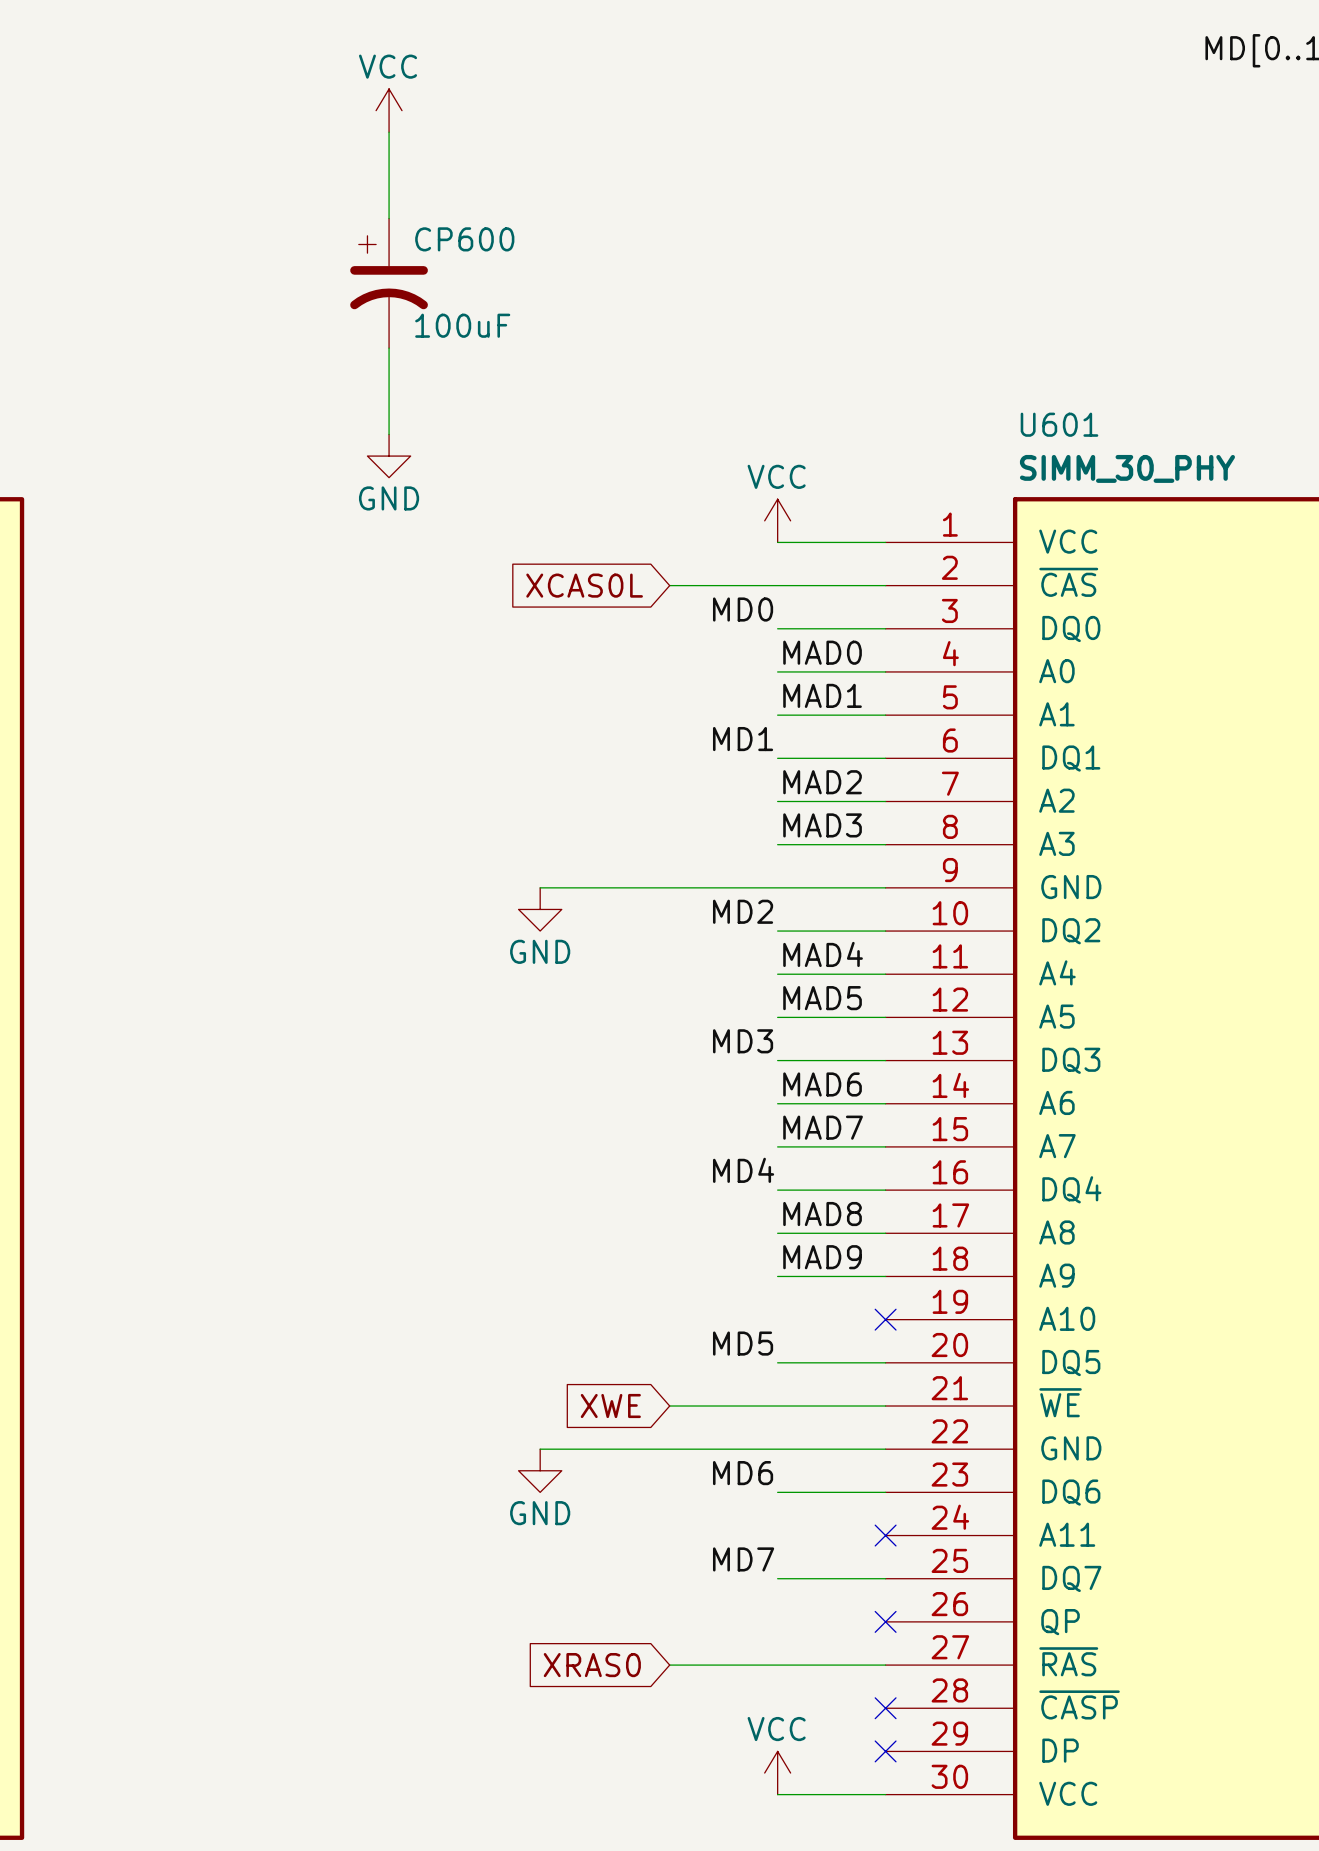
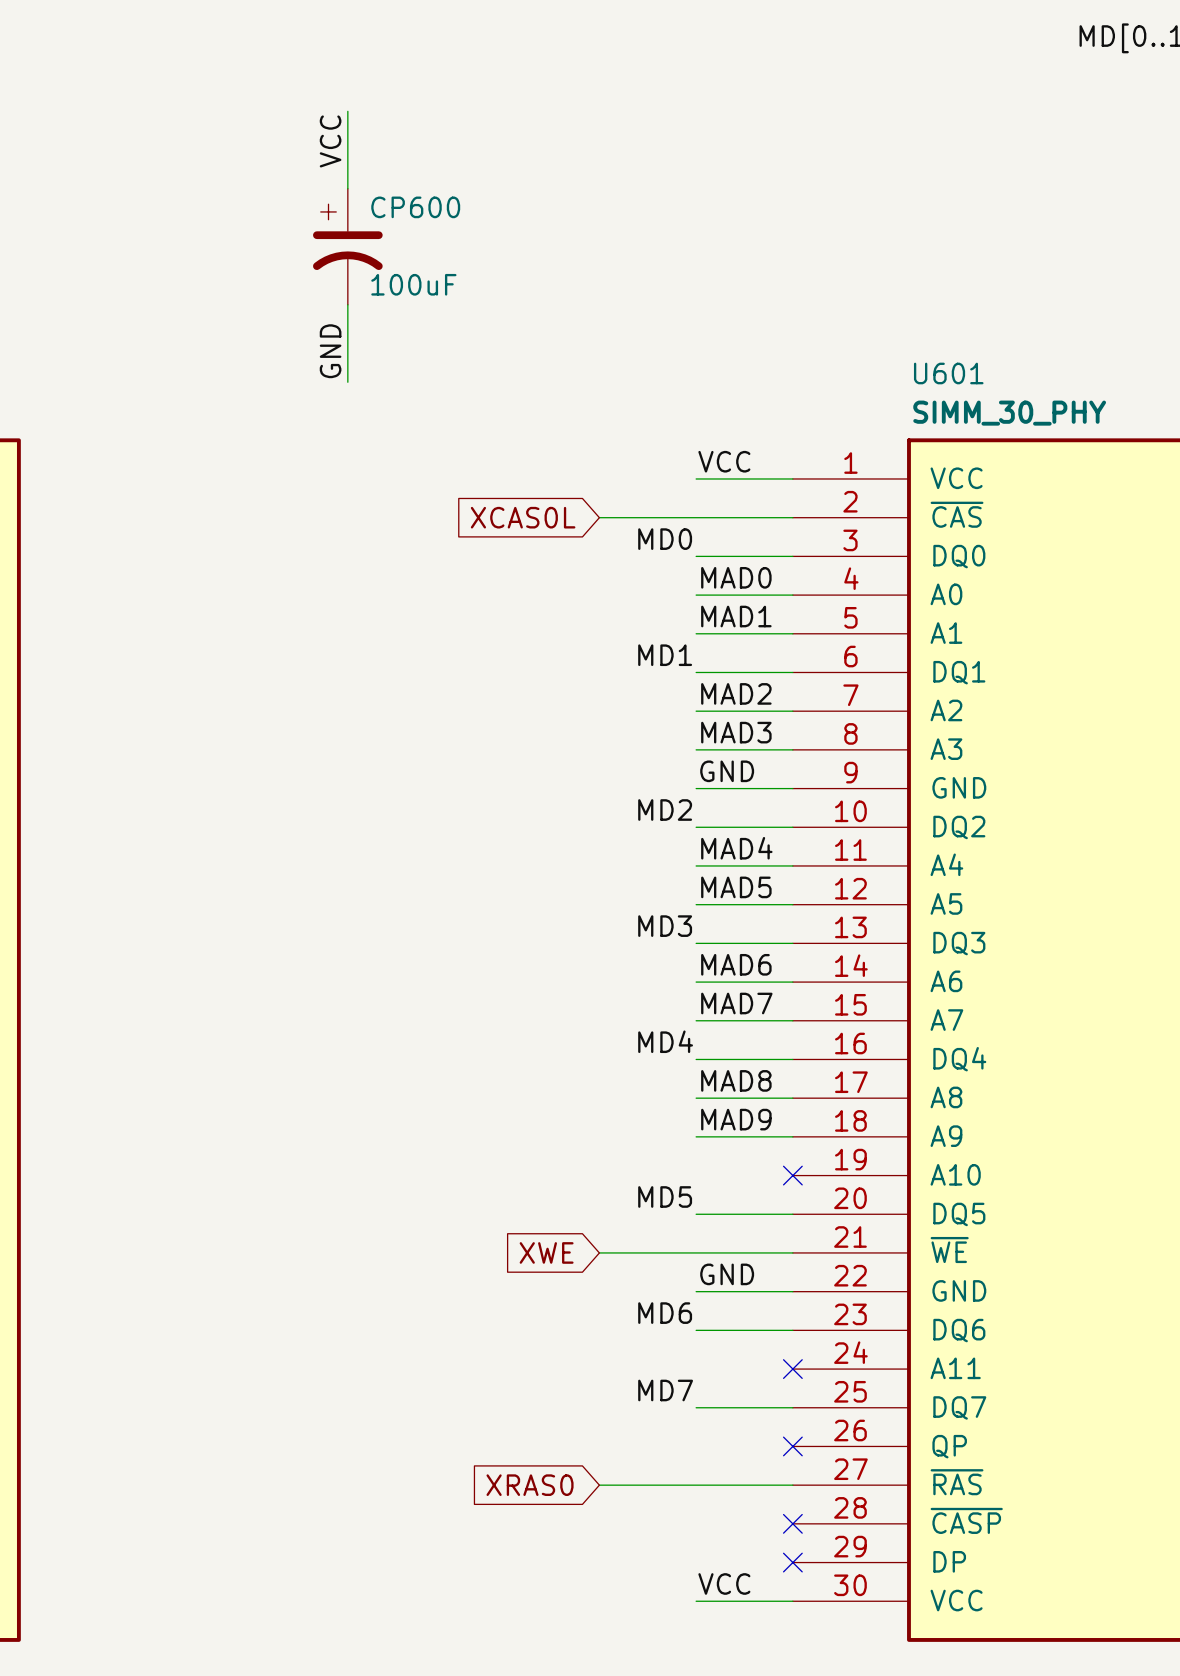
power symbol: VCC (389, 110) -> none
label: none -> VCC (330, 141)
label: none -> GND (330, 351)
power symbol: GND (389, 456) -> none
power symbol: VCC (777, 520) -> none
label: none -> VCC (724, 461)
label: none -> GND (727, 771)
wire: (540, 887) (777, 887) -> none
power symbol: GND (540, 909) -> none
label: none -> GND (727, 1274)
wire: (540, 1449) (777, 1449) -> none
power symbol: GND (540, 1470) -> none
power symbol: VCC (777, 1773) -> none
label: none -> VCC (724, 1583)

